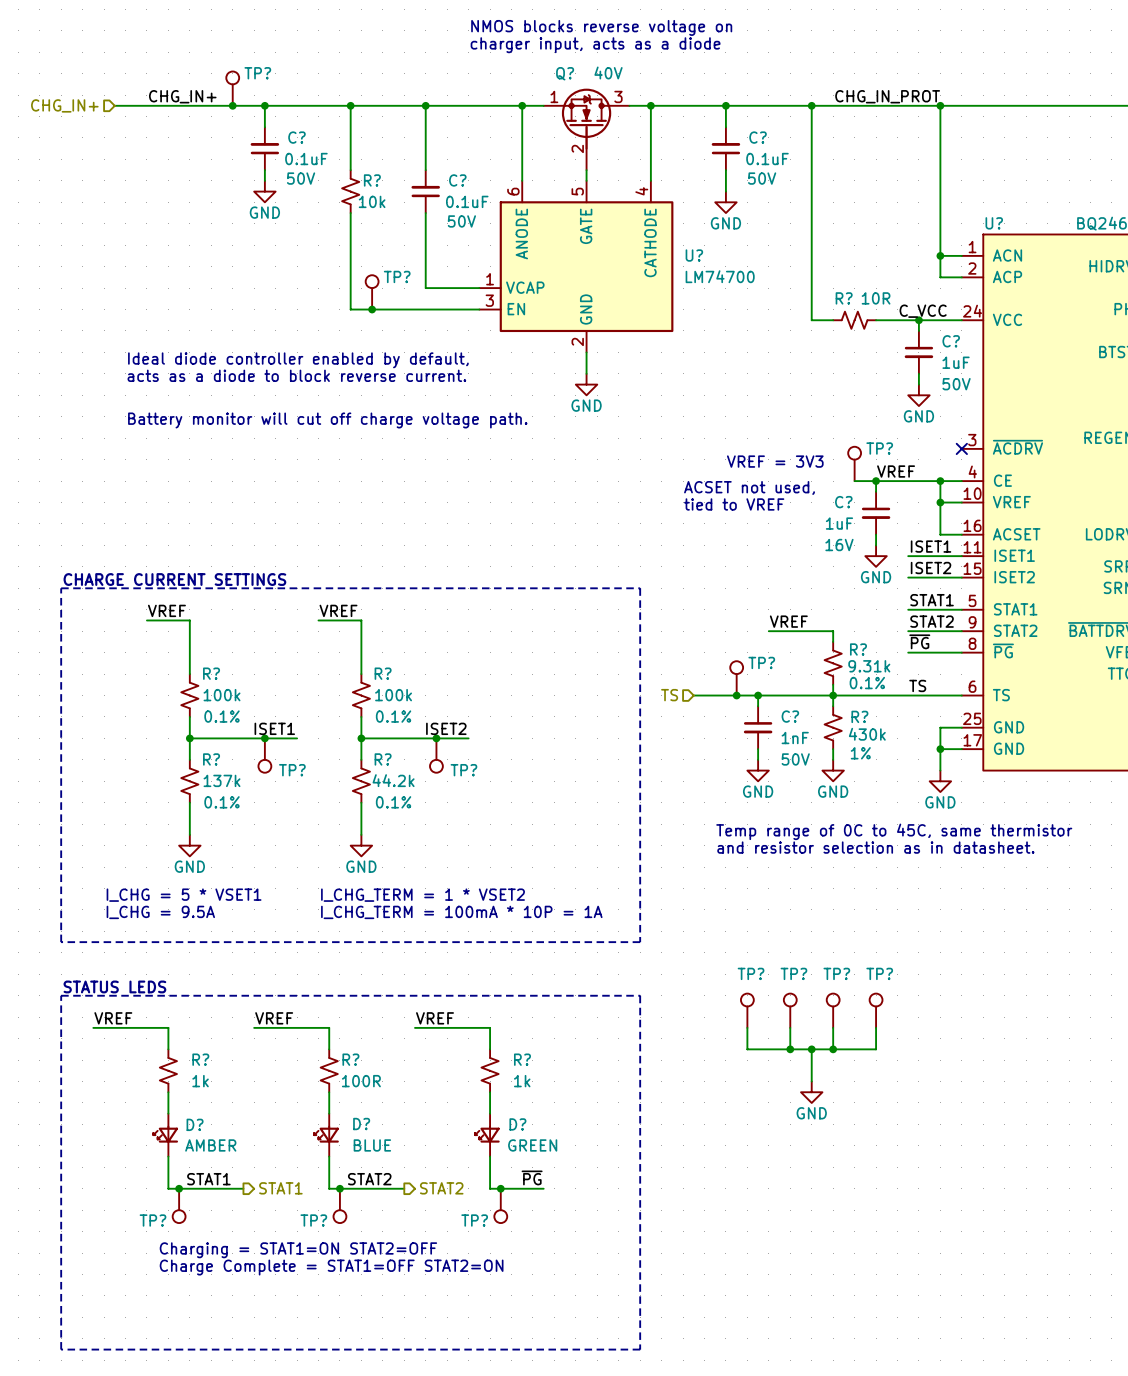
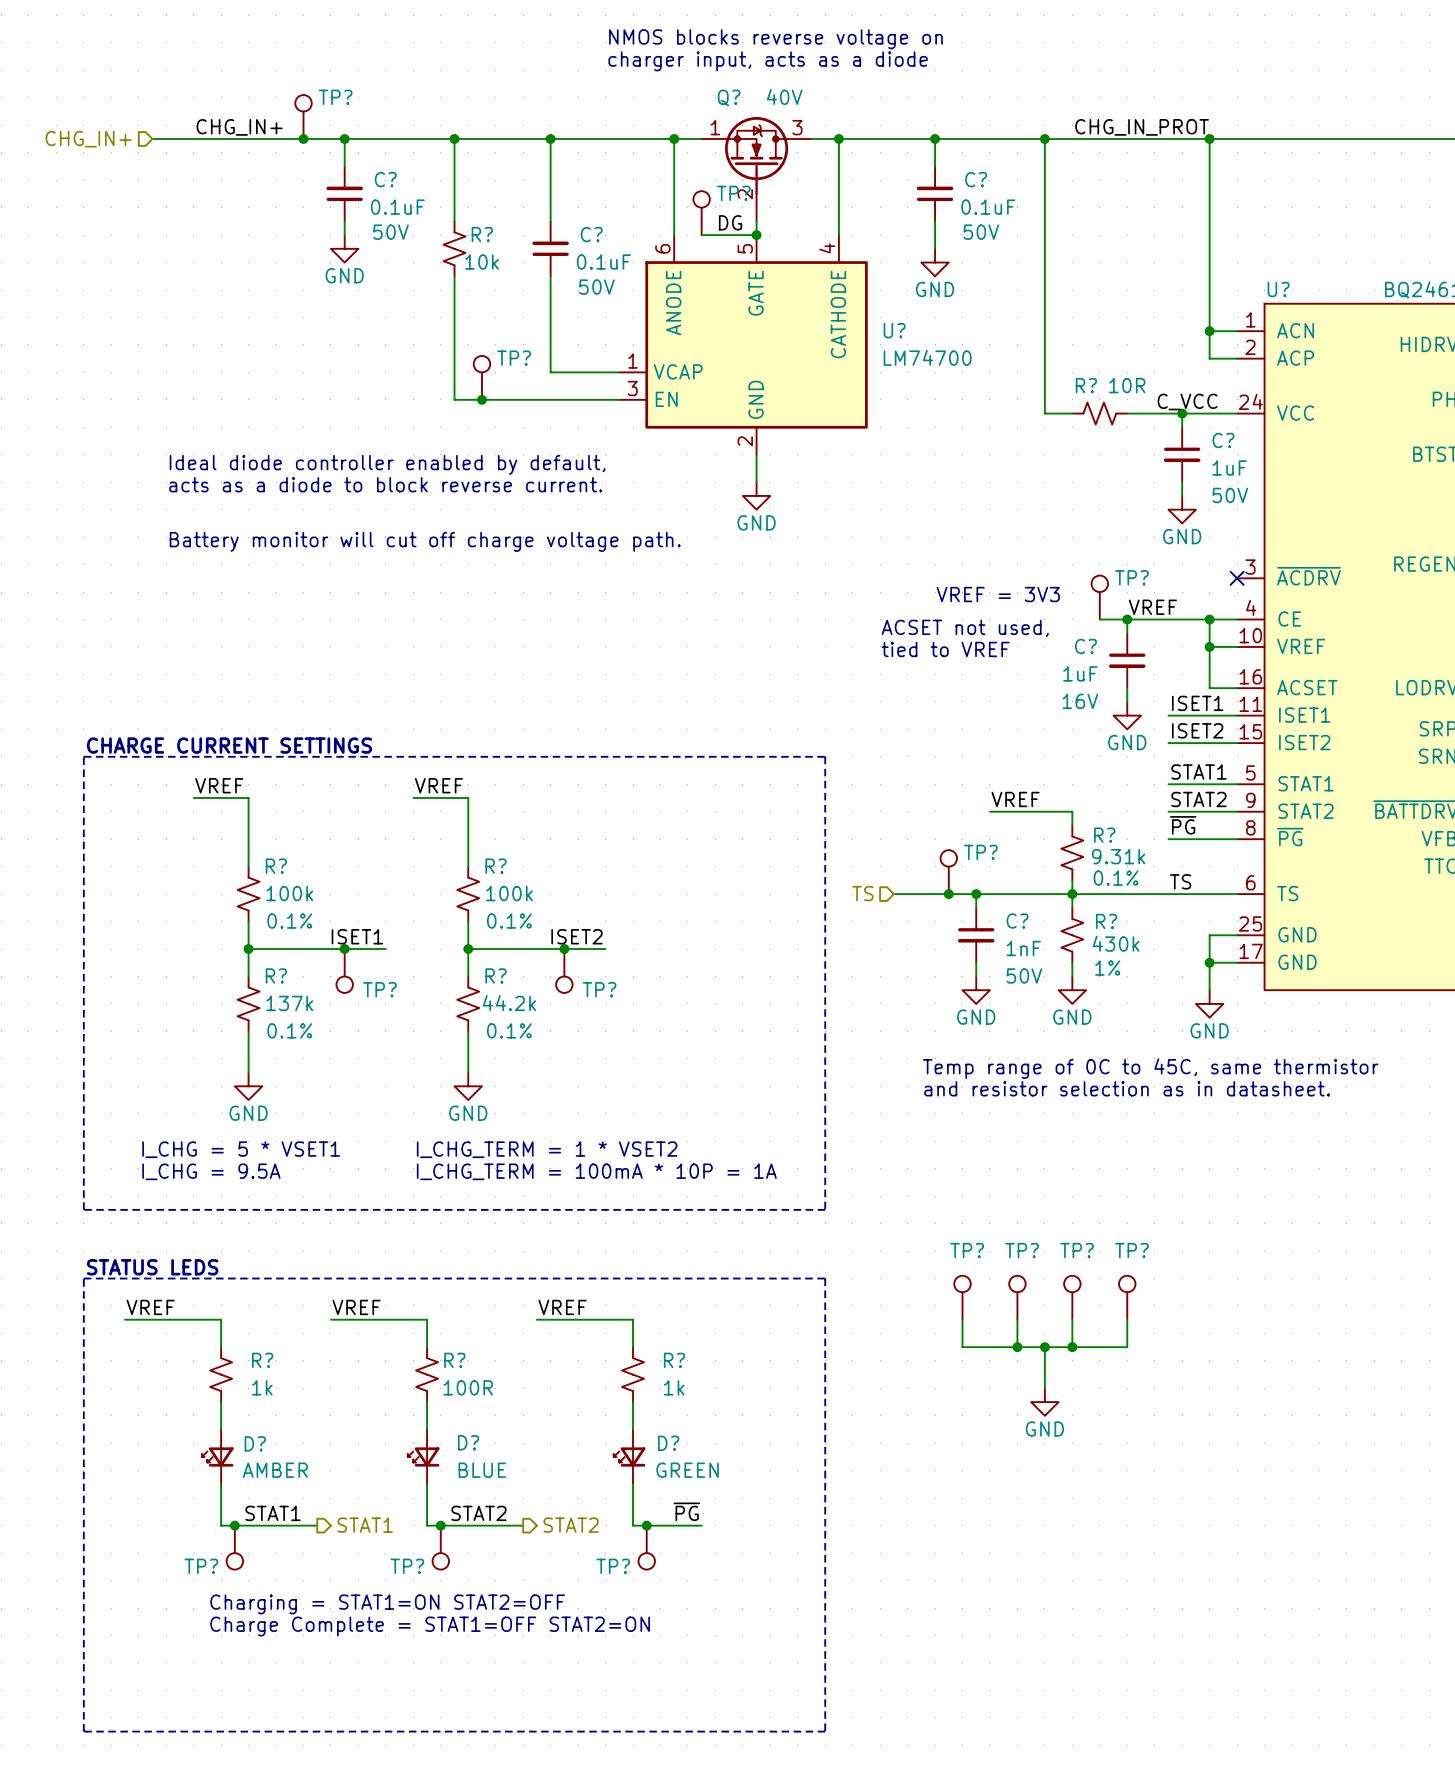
TP?: none -> (701, 213)
label: none -> DG (730, 222)
wire: none -> (701, 235) (756, 235)
junction: none -> (756, 235)

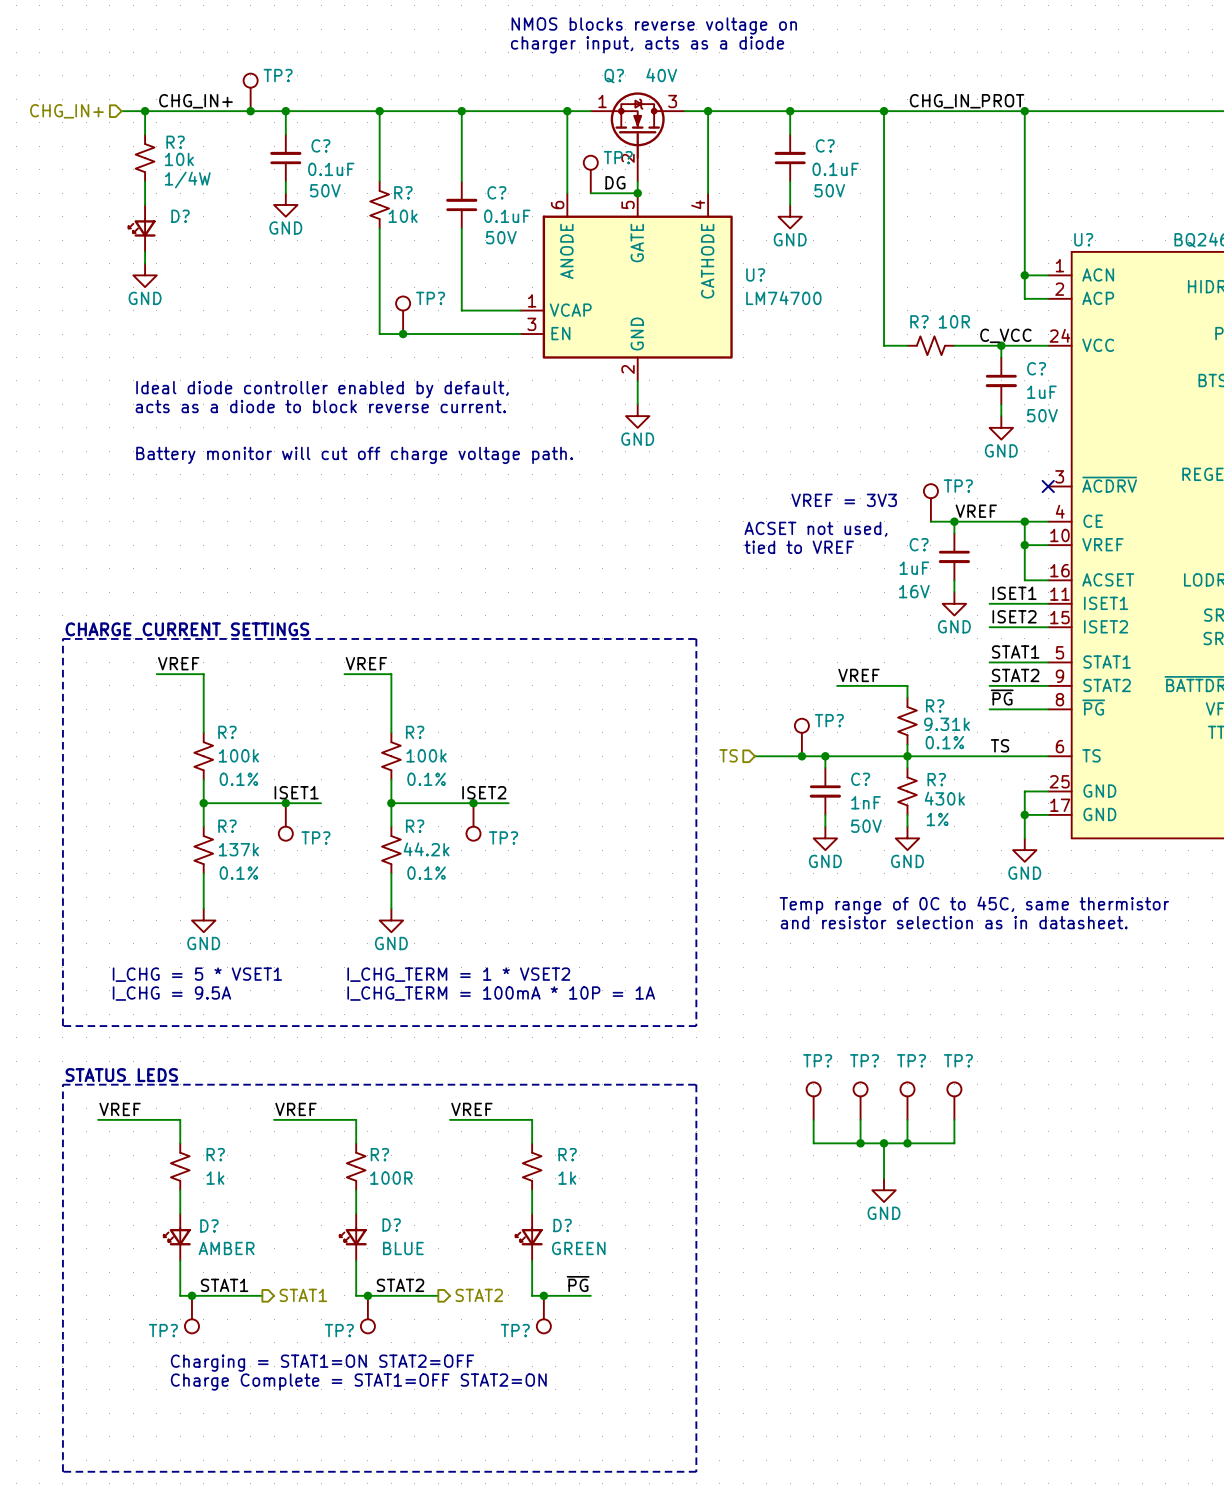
wire: none -> (145, 111) (145, 134)
junction: none -> (145, 111)
R?: none -> 10k (145, 158)
wire: none -> (145, 181) (145, 204)
D?: none -> (142, 228)
wire: none -> (145, 251) (145, 263)
power symbol: none -> GND (145, 275)

